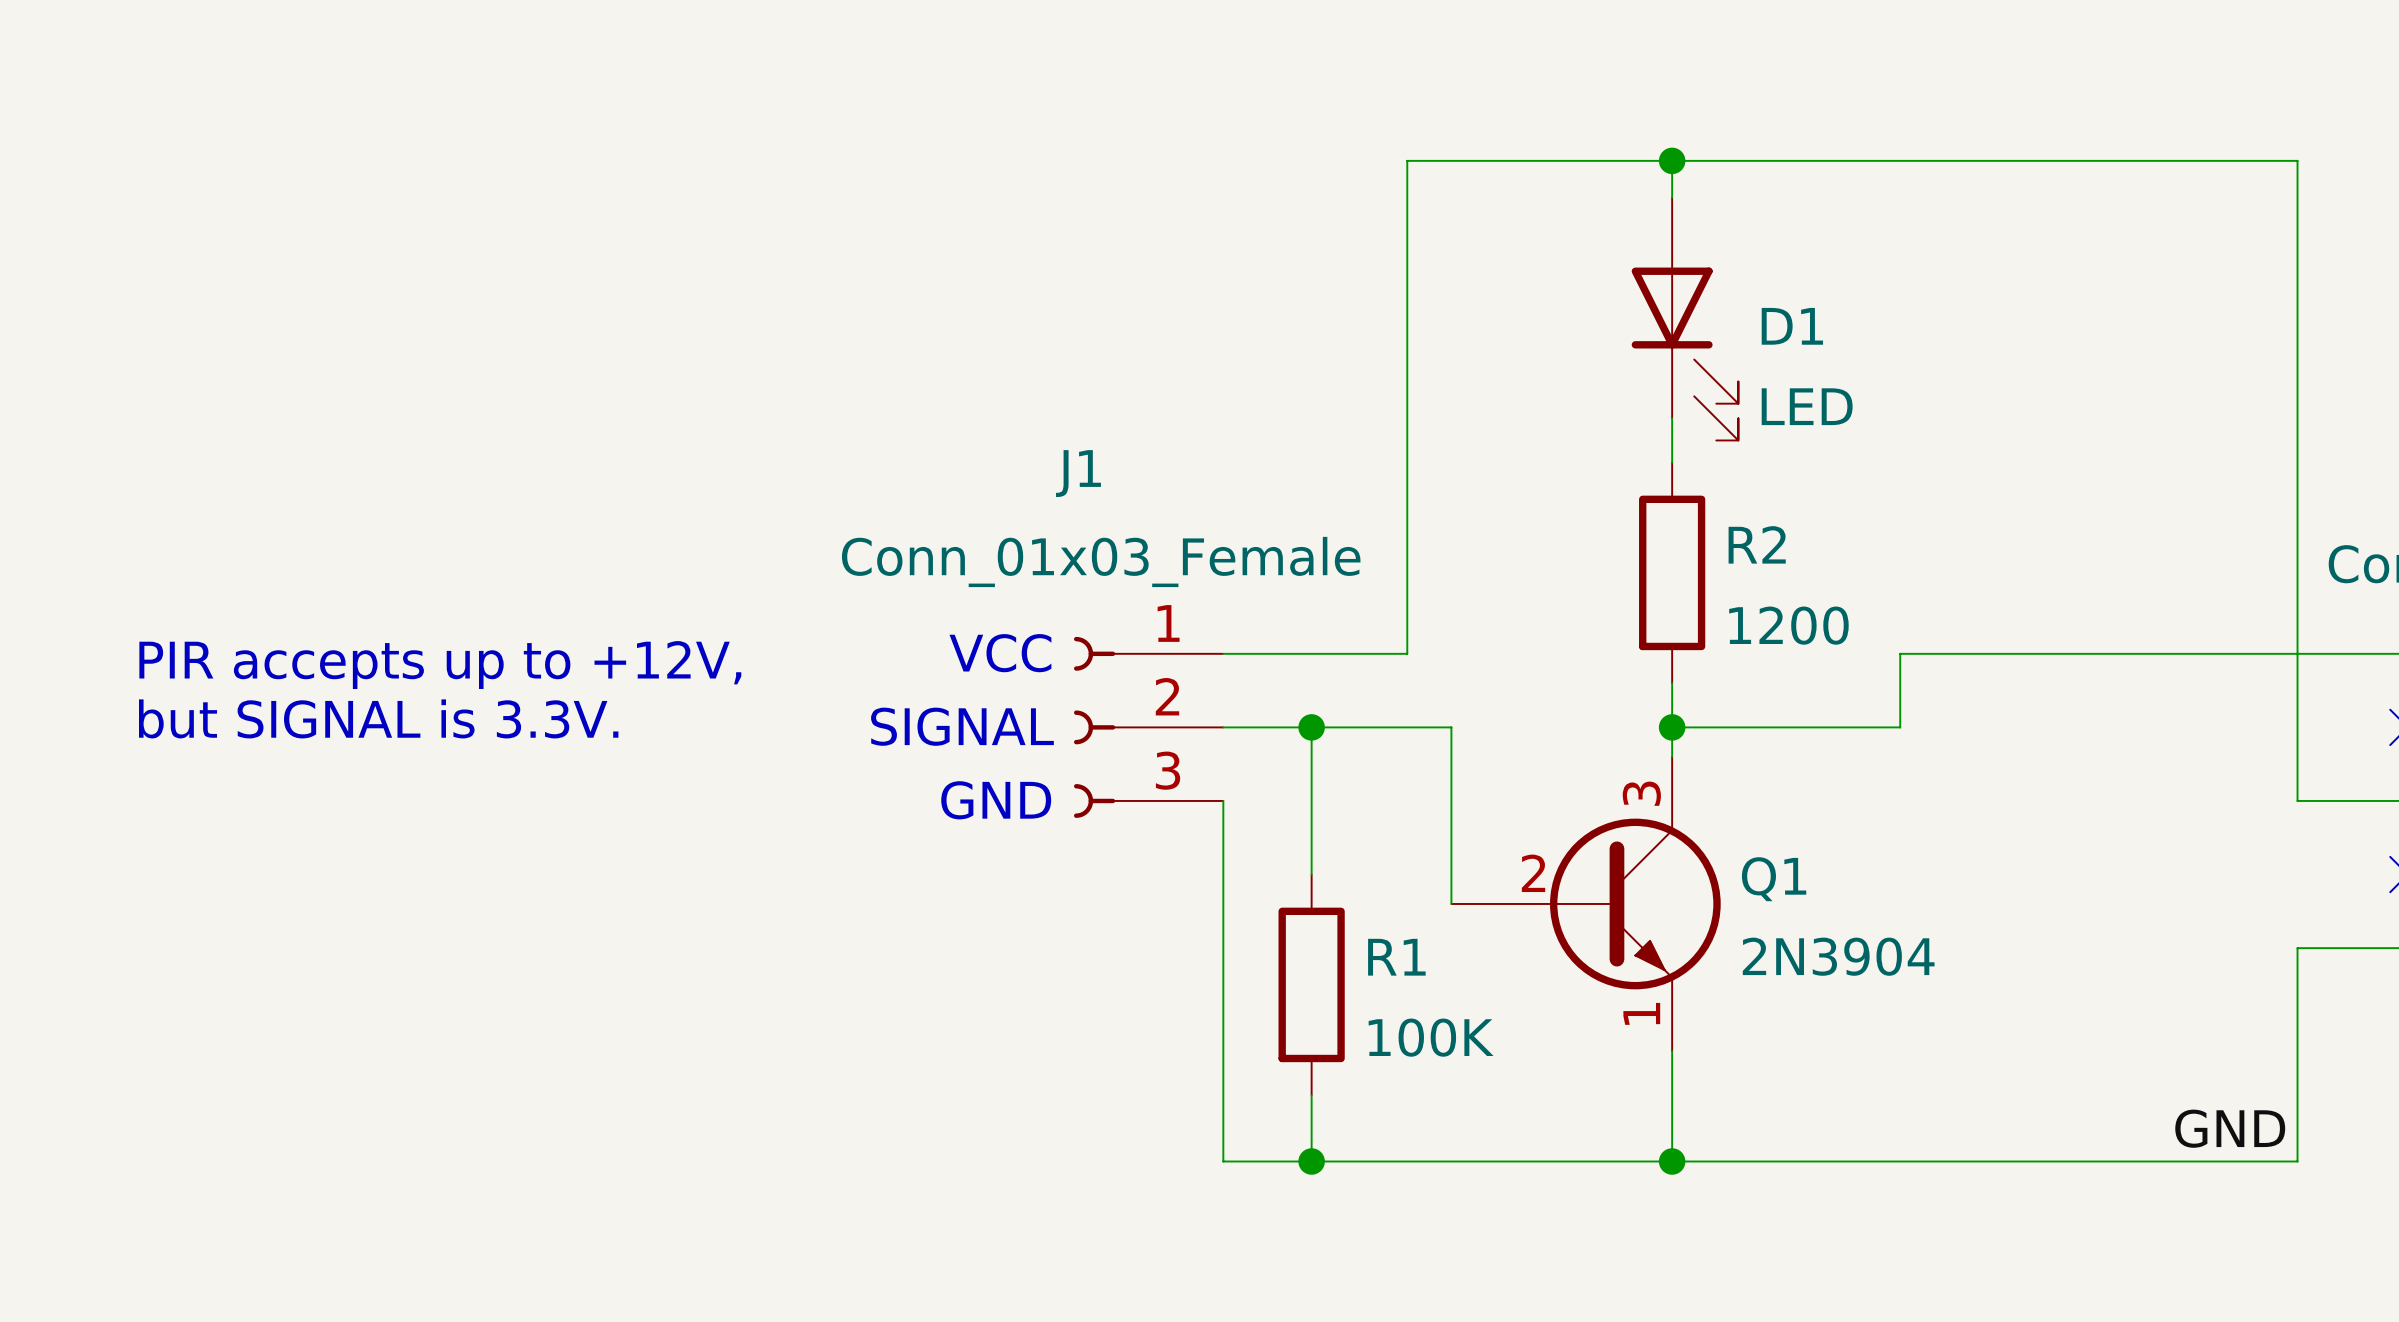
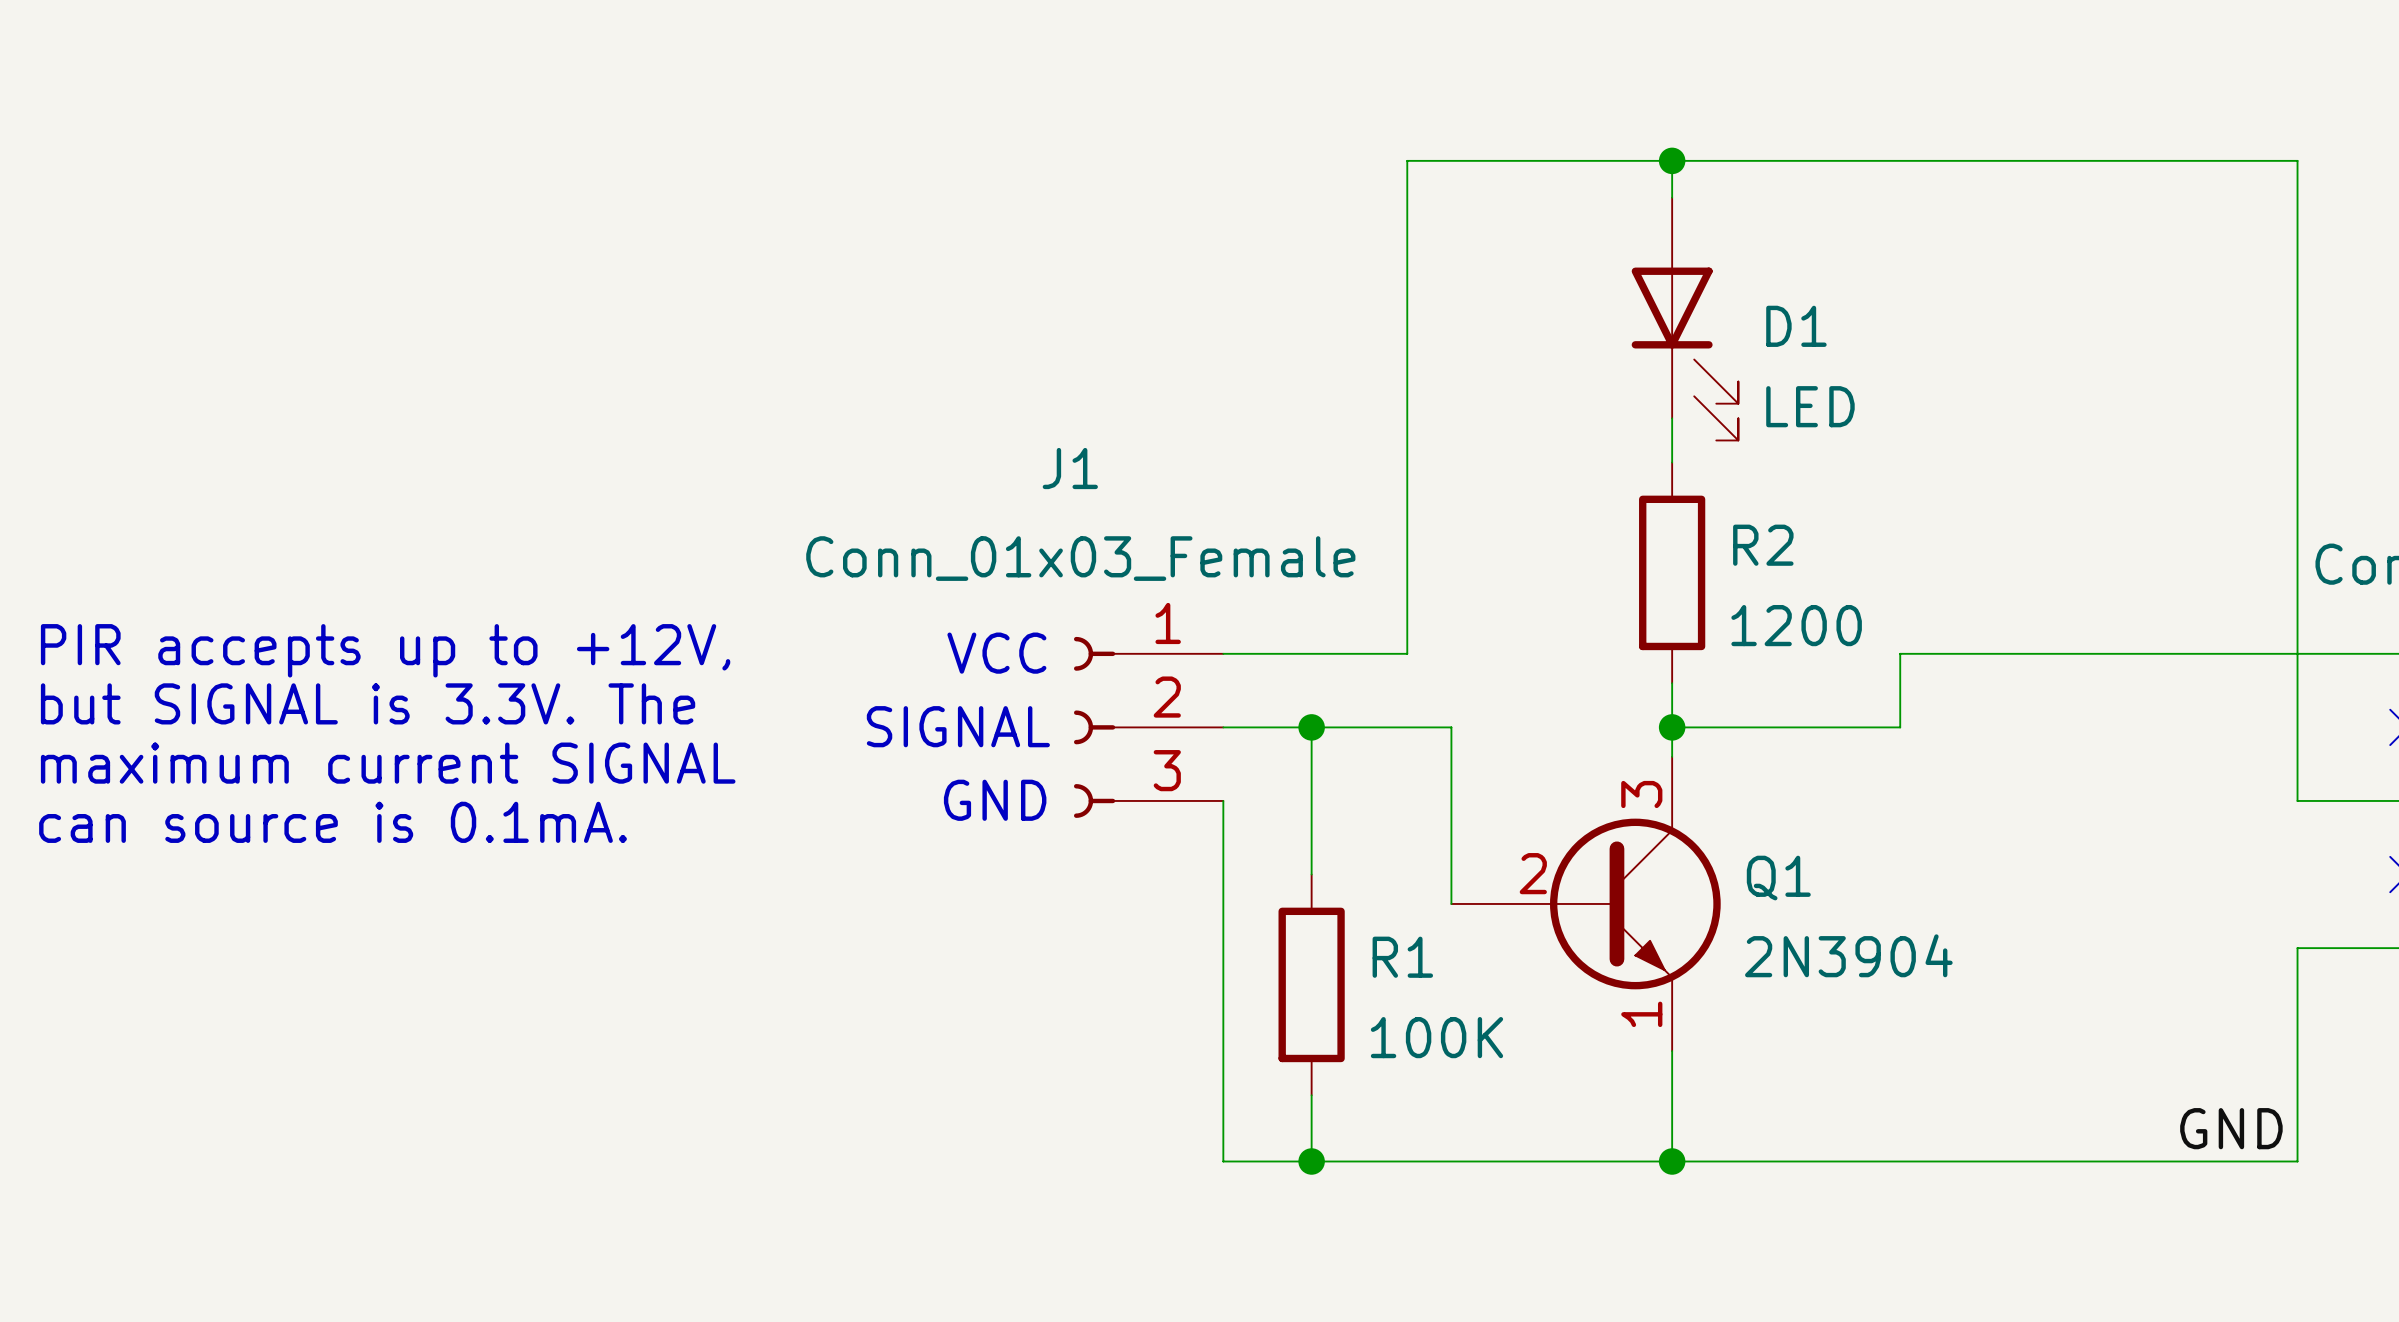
text position: PIR accepts up to +12V, (440, 665) -> PIR accepts up to +12V, (385, 650)
text: but SIGNAL is 3.3V. (378, 718) -> but SIGNAL is 3.3V. The (368, 703)
text: none -> maximum current SIGNAL (388, 763)
text: none -> can source is 0.1mA. (333, 822)

